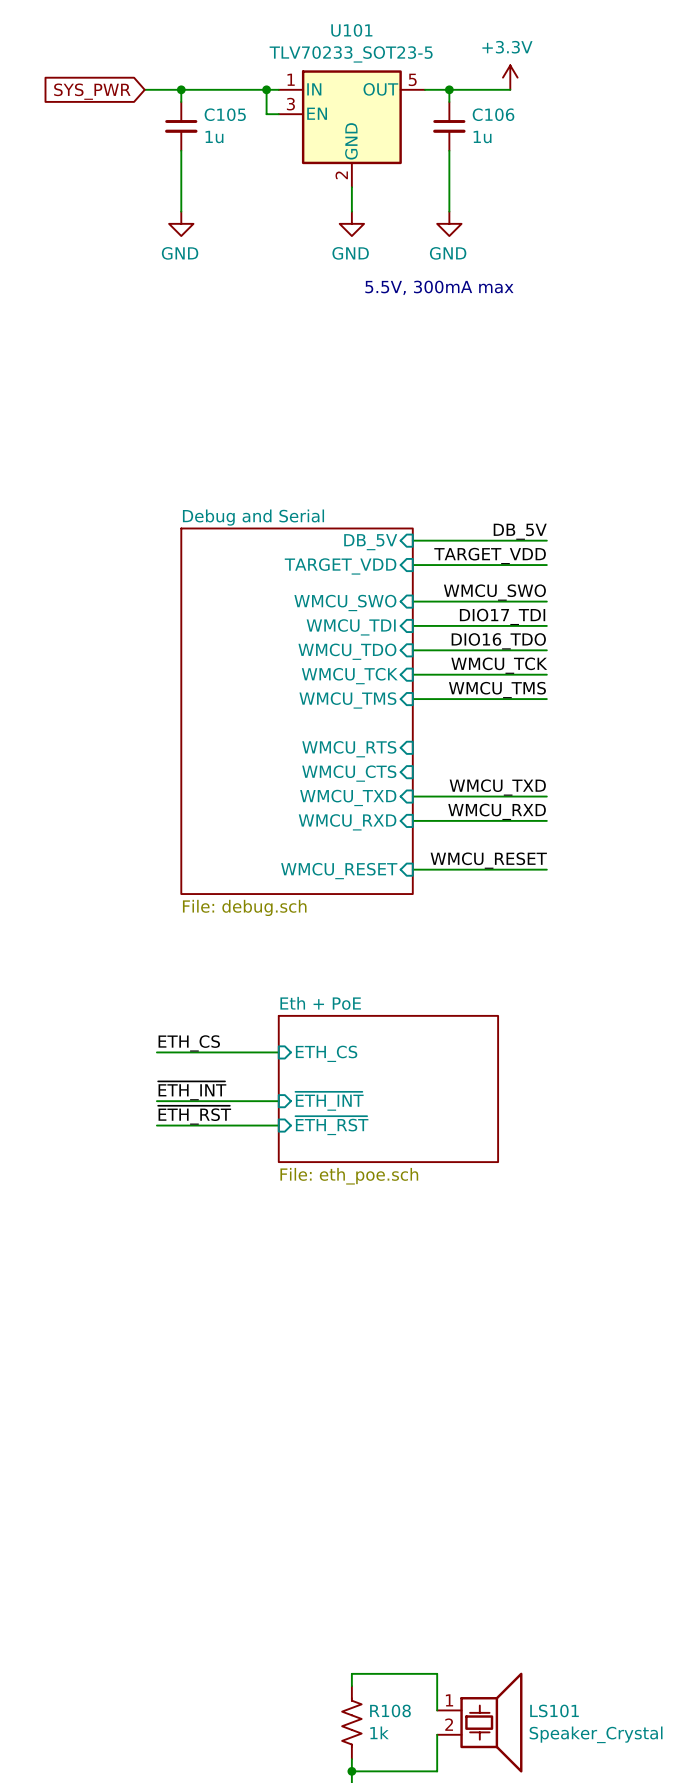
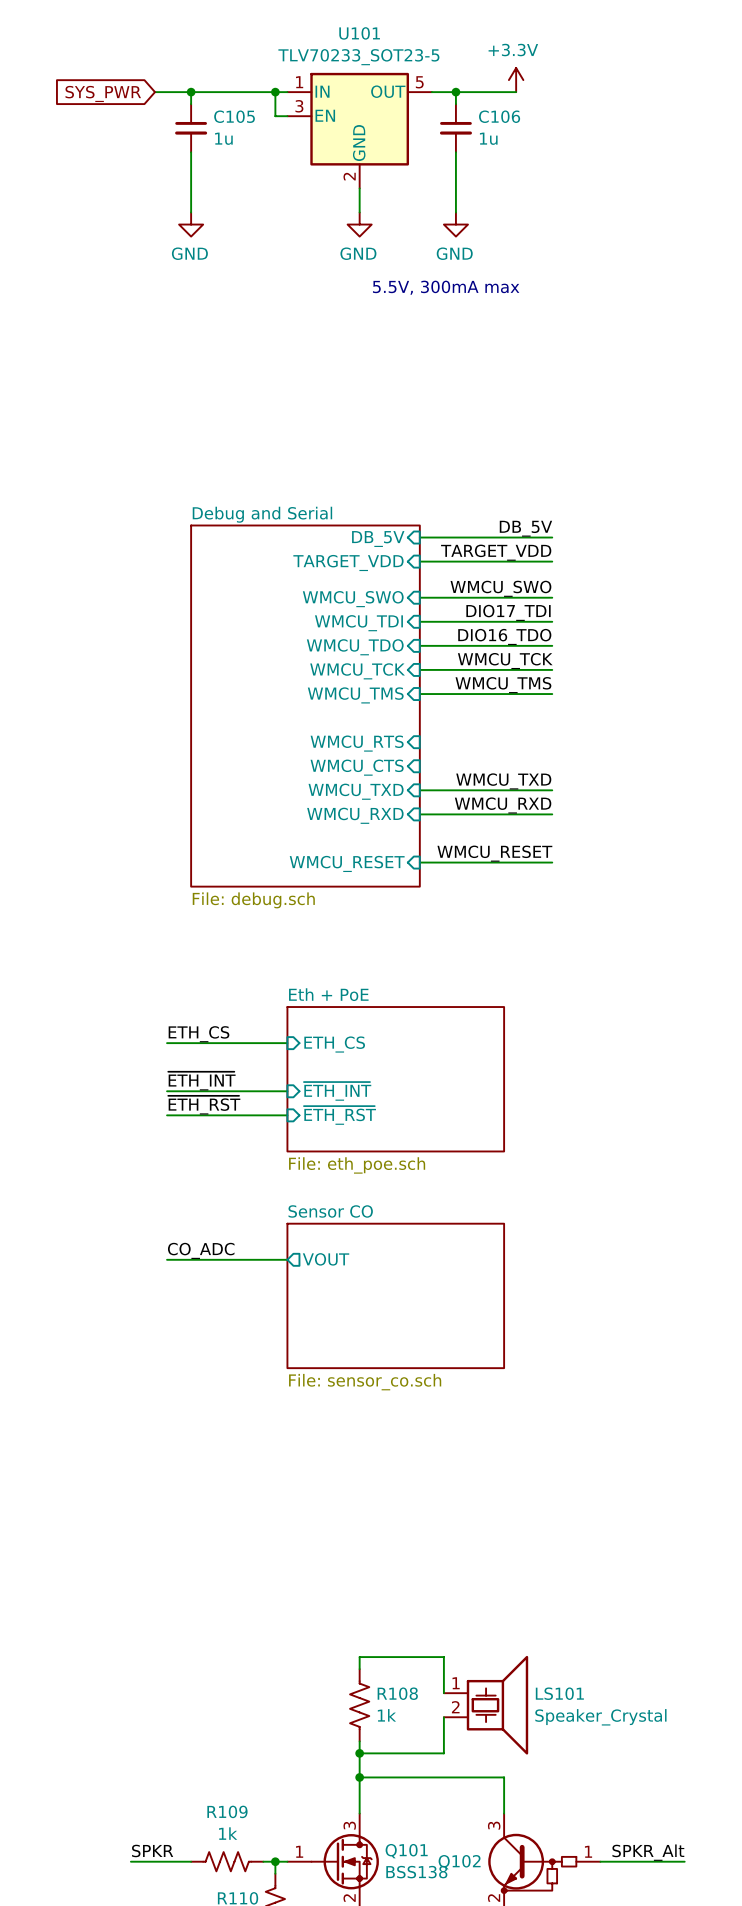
label: none -> CO_ADC (201, 1250)
wire: none -> (167, 1259) (287, 1259)
sheet pin: none -> VOUT (326, 1259)
sheet Sensor CO: none -> File: sensor_co.sch (395, 1295)

